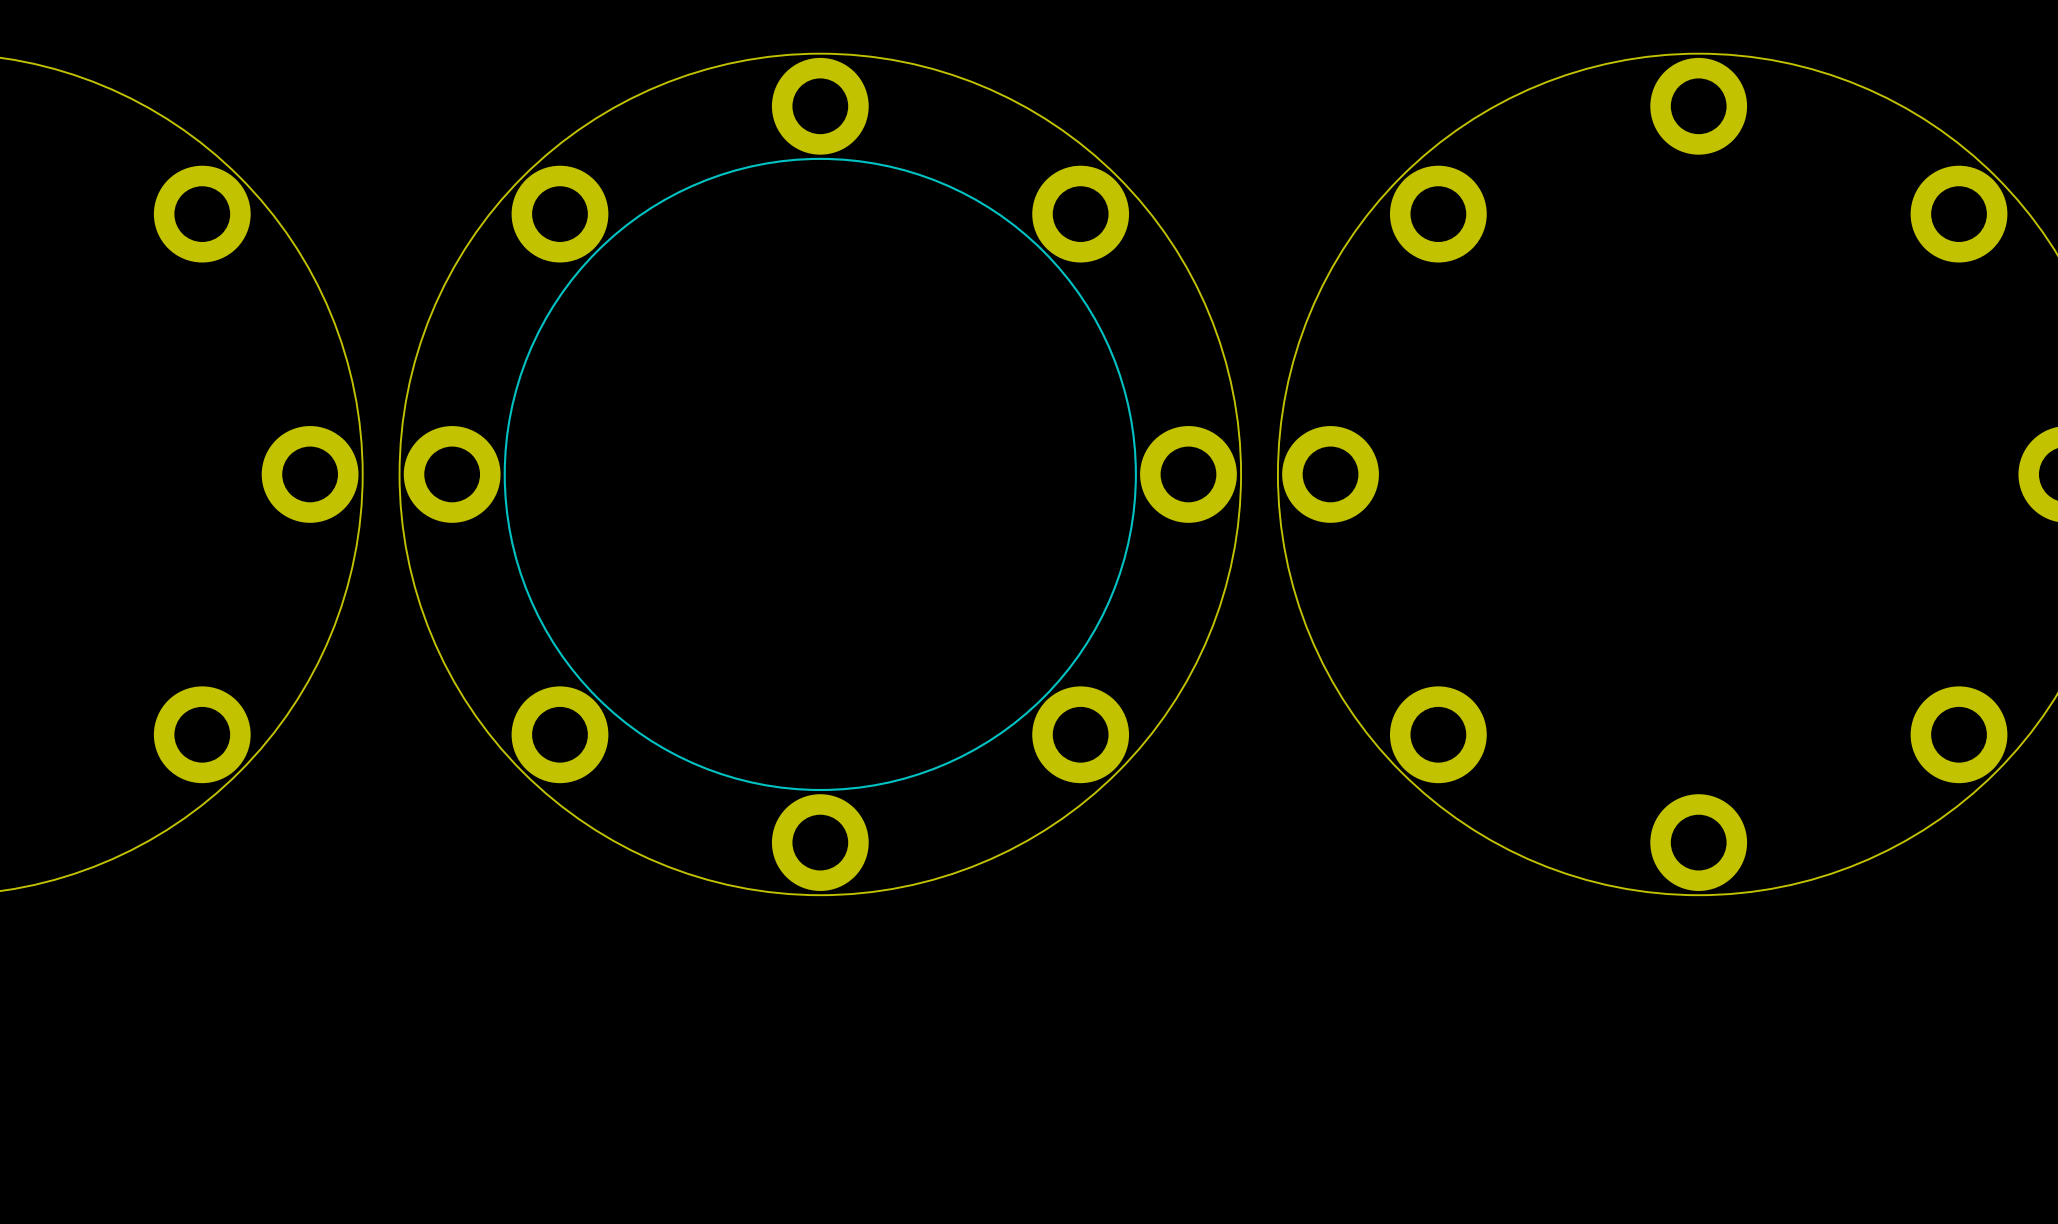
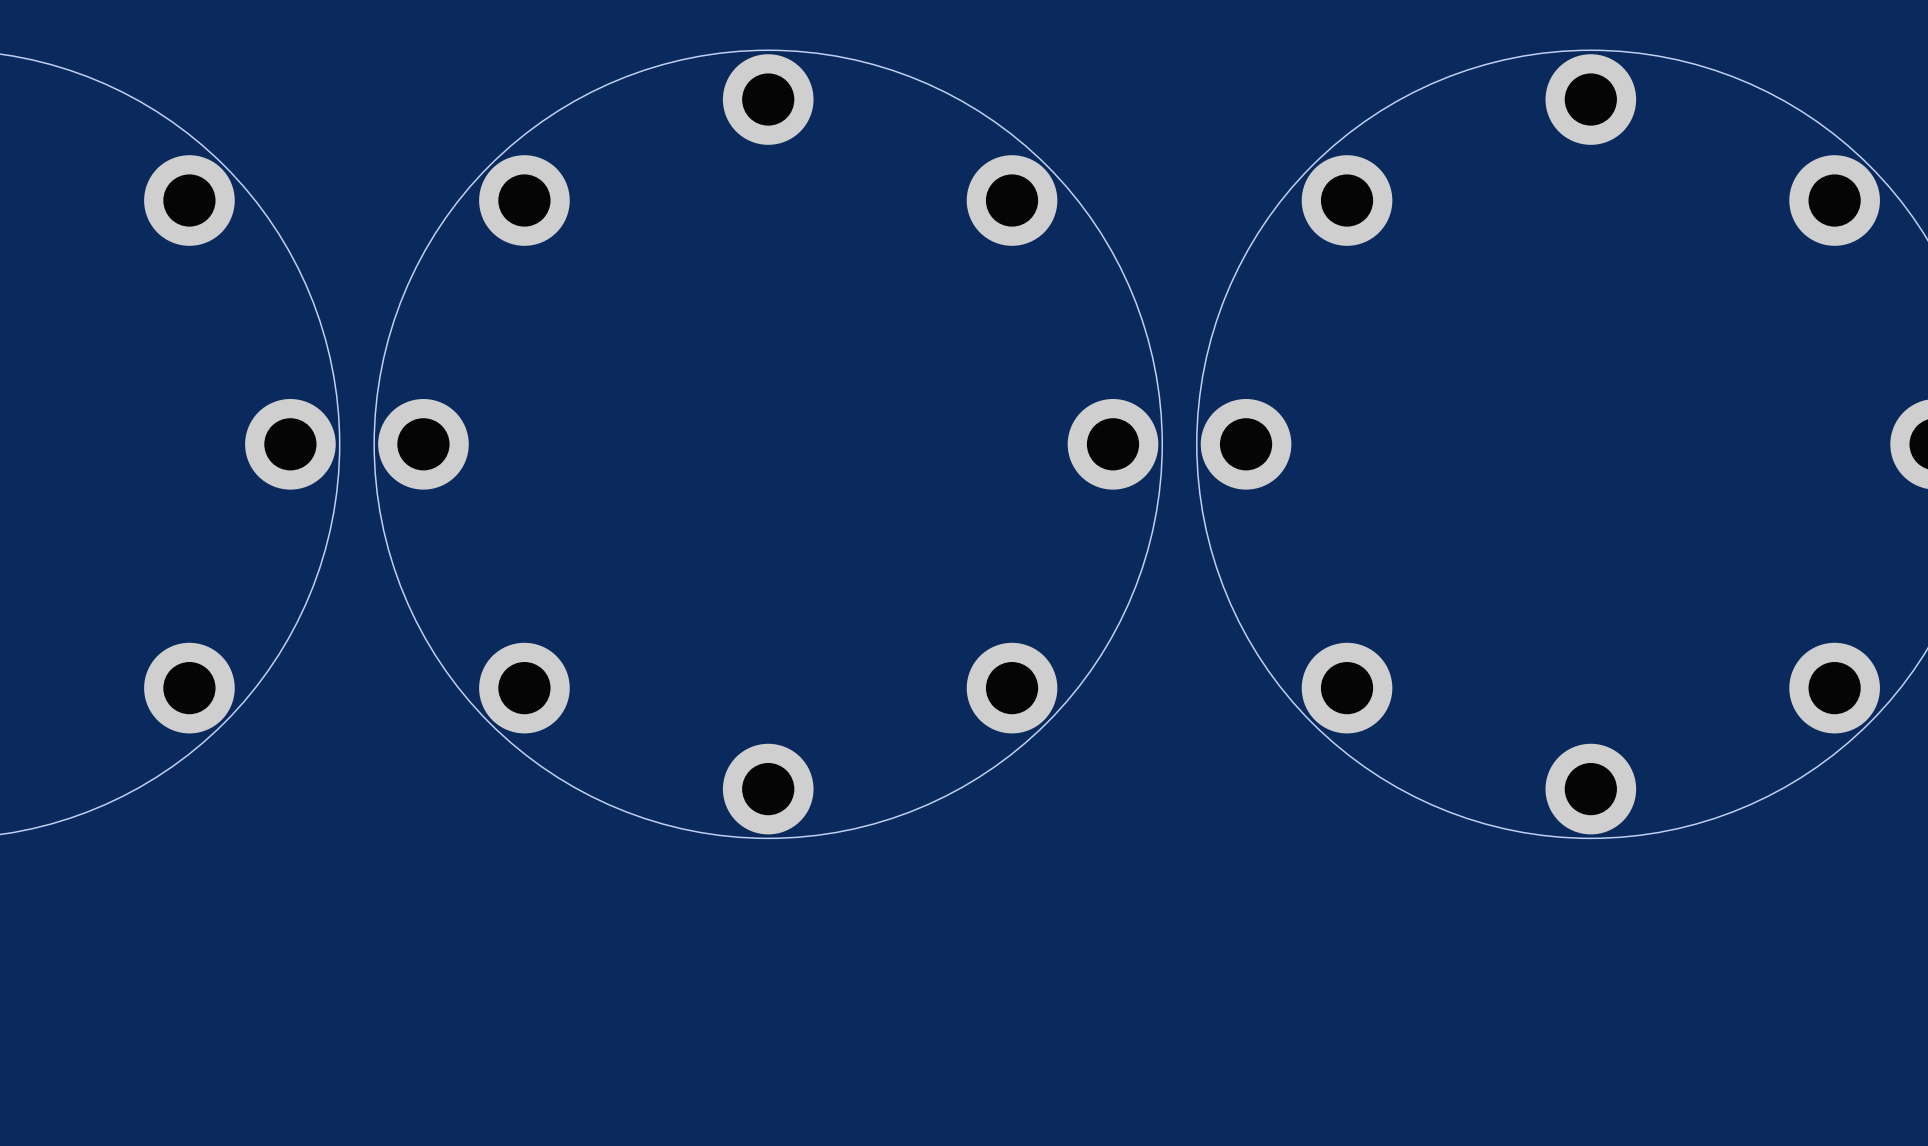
drawing: [503, 157, 1137, 792] -> none

